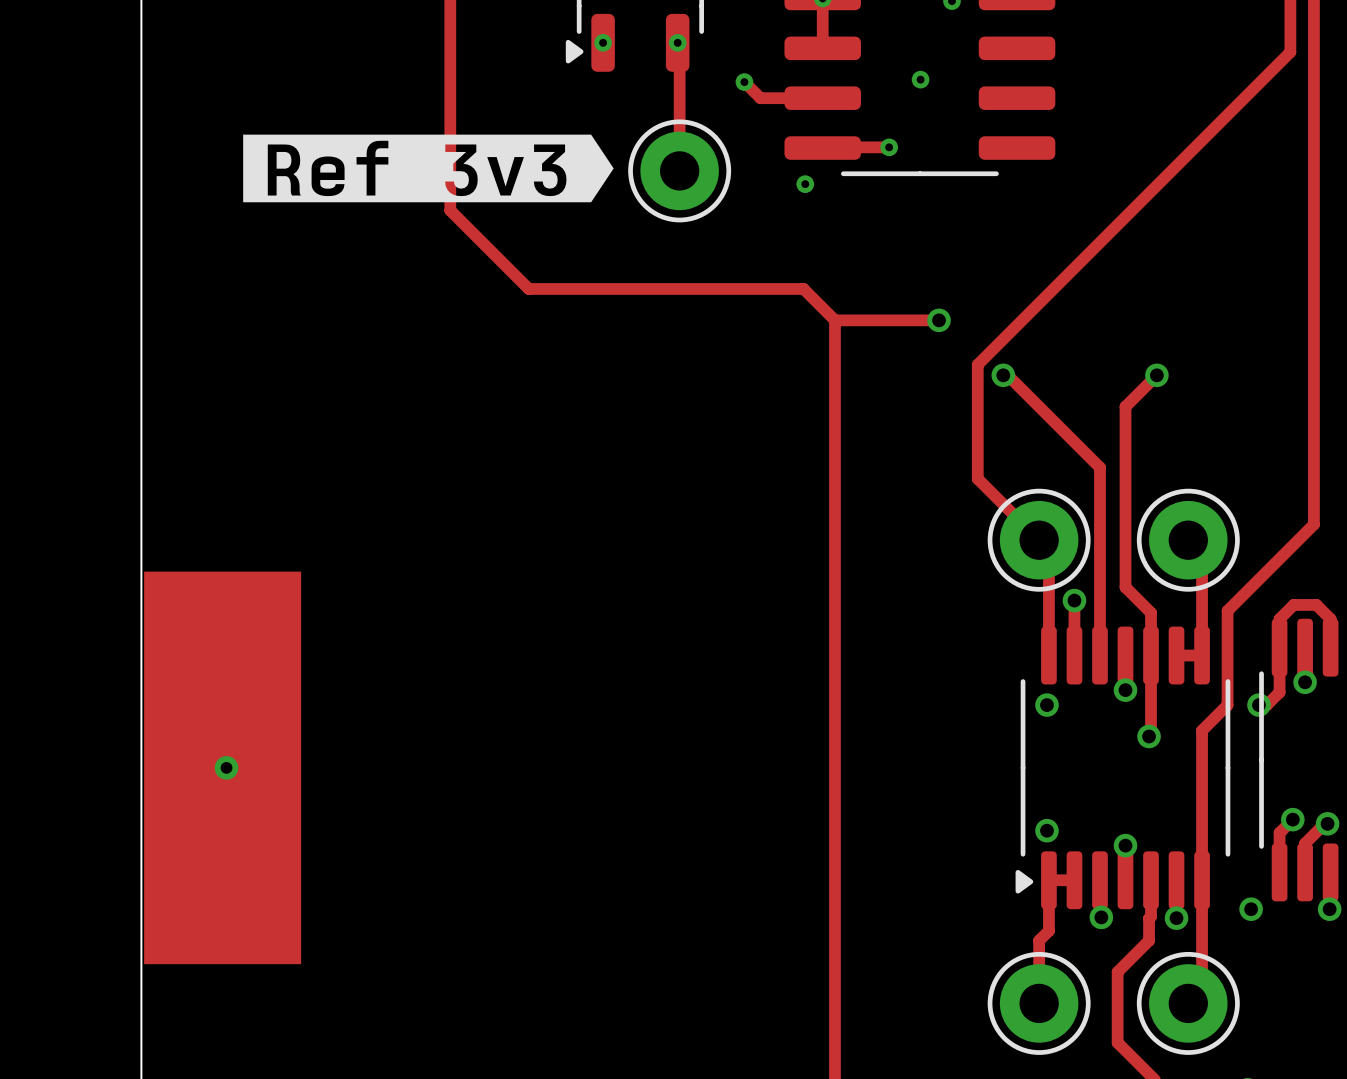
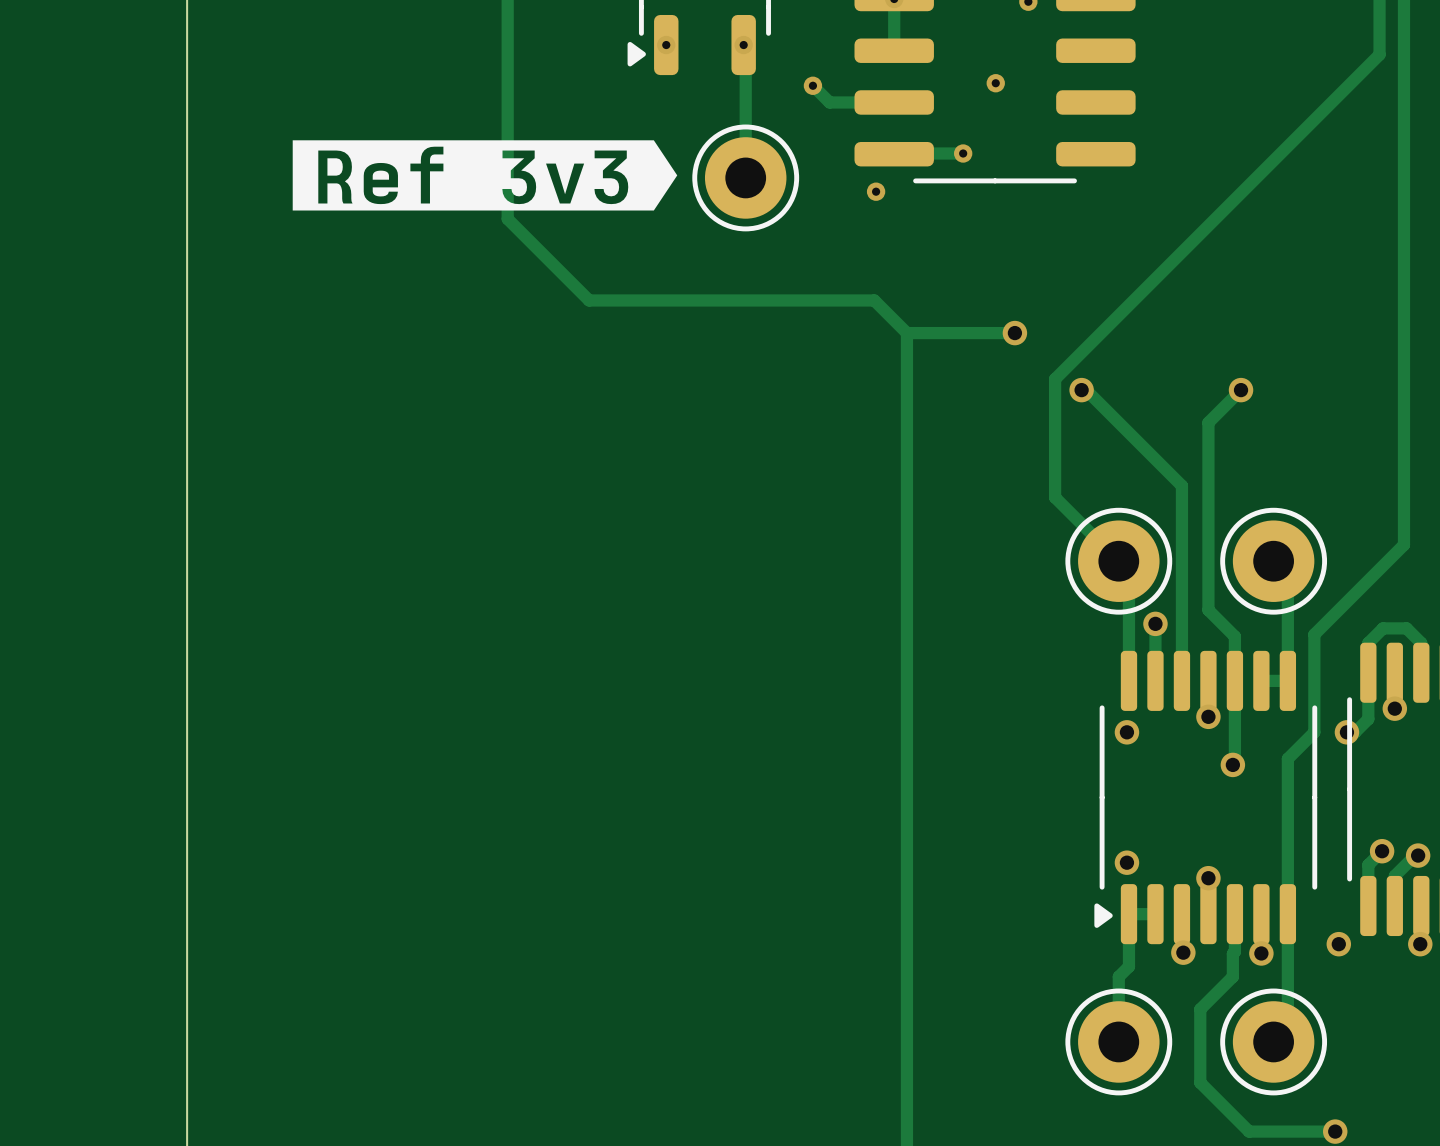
part: (222, 767) -> none
via: (226, 767) -> none

